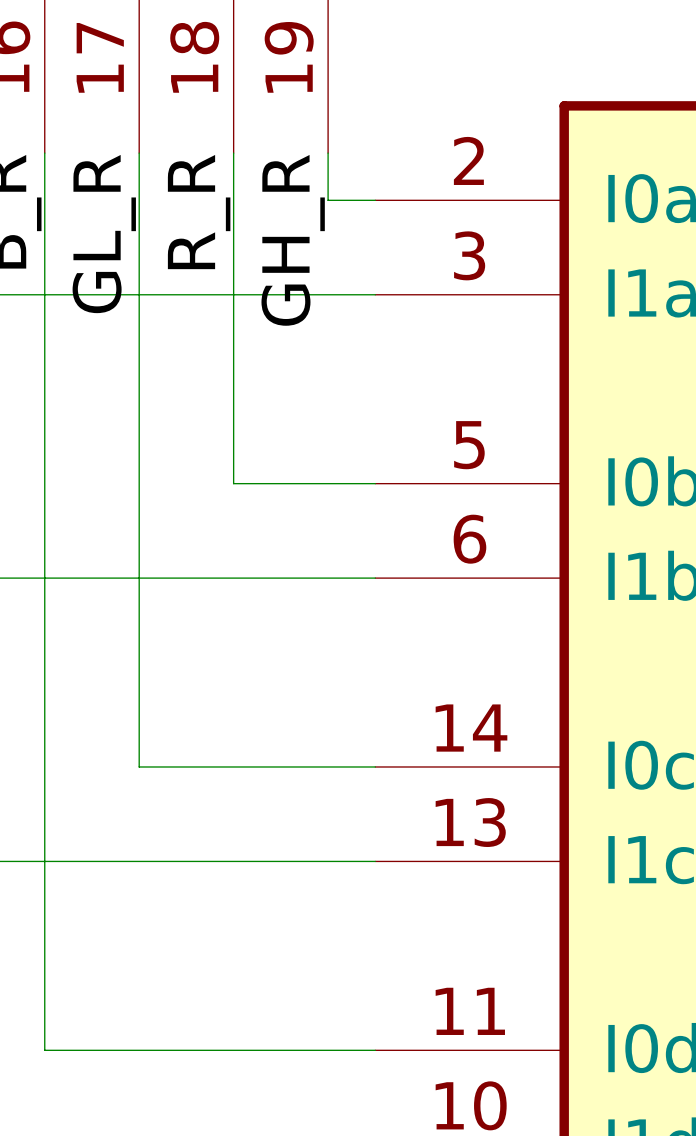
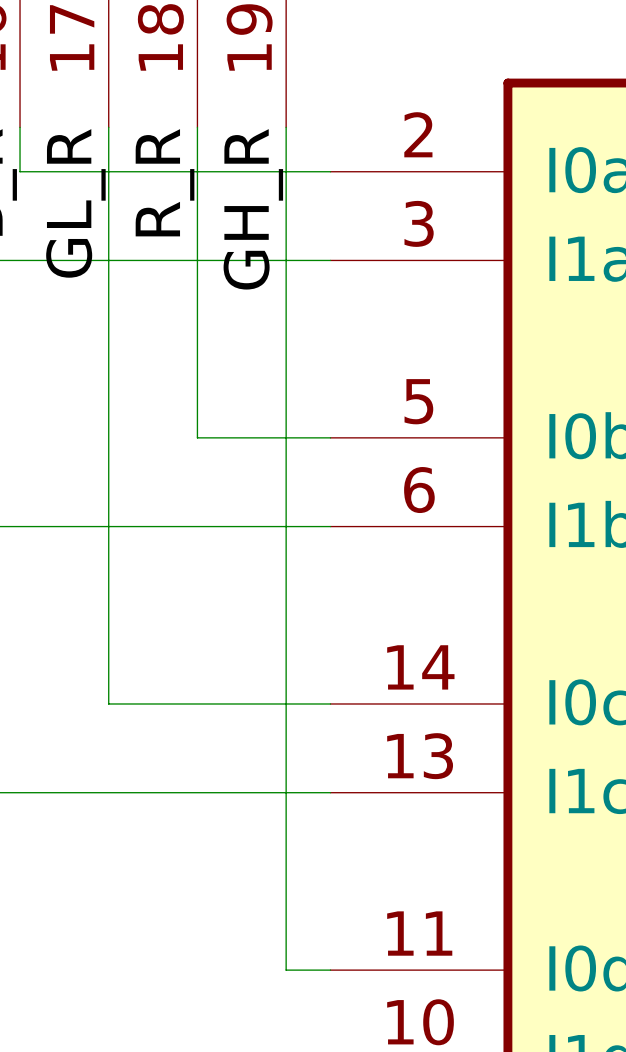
wire: (44, 200) (44, 1050) (328, 1050) -> (20, 171) (286, 171) (286, 970)

